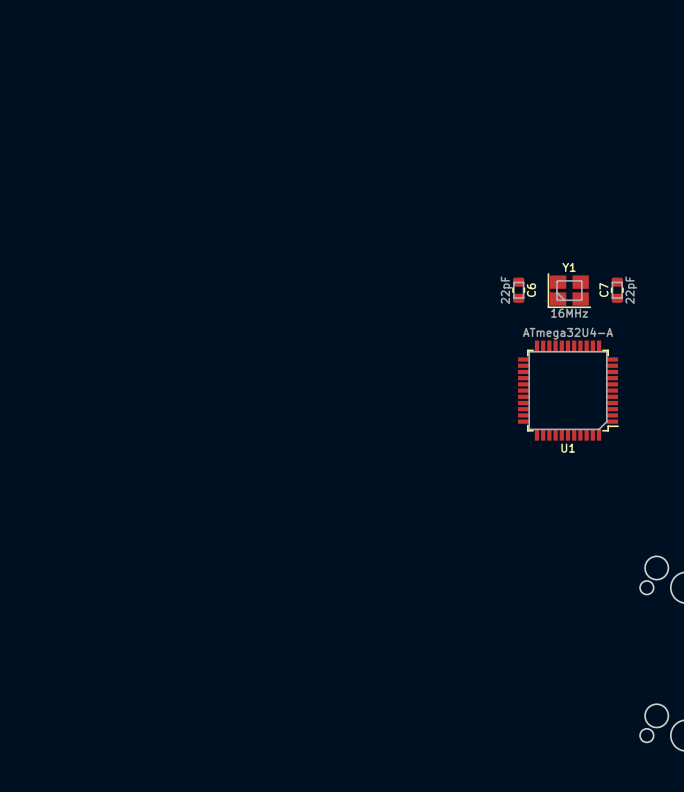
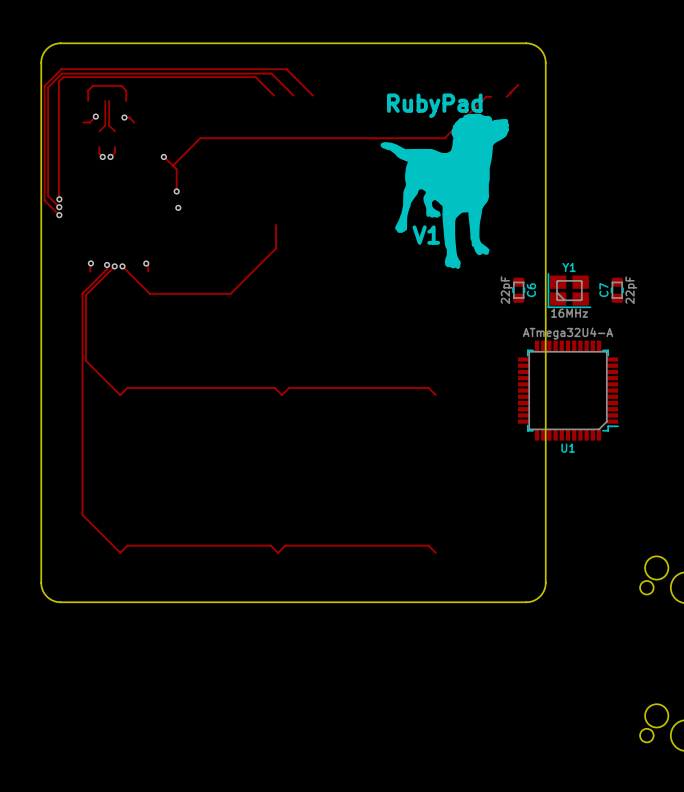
board edge: none -> (60, 43) (526, 43) (534, 45) (541, 50) (545, 62) (545, 582) (543, 591) (538, 598) (526, 602) (60, 602) (52, 600) (45, 594) (41, 582) (41, 62) (46, 49) (60, 43)
track: none -> (518, 84) (506, 96)
track: none -> (274, 95) (255, 77) (63, 77) (58, 81) (59, 199)
track: none -> (293, 95) (271, 73) (61, 73) (48, 87) (48, 195) (59, 207)
track: none -> (312, 95) (286, 69) (61, 69) (44, 86) (44, 200) (59, 215)
track: none -> (491, 96) (486, 96) (444, 138) (200, 138) (173, 166)
track: none -> (88, 100) (88, 90) (93, 85) (121, 85) (126, 90) (126, 100)
track: none -> (105, 100) (105, 125) (99, 131)
track: none -> (109, 100) (109, 125) (115, 131)
drawing: none -> [380, 113, 510, 270]
track: none -> (95, 116) (89, 122) (83, 122)
via: none -> (95, 116)
track: none -> (124, 117) (129, 117) (134, 122)
via: none -> (124, 117)
track: none -> (99, 147) (99, 153) (102, 156)
track: none -> (115, 147) (115, 152) (110, 156)
via: none -> (102, 156)
via: none -> (110, 156)
track: none -> (163, 156) (176, 169) (176, 191)
via: none -> (163, 156)
via: none -> (176, 191)
via: none -> (59, 199)
via: none -> (59, 207)
via: none -> (178, 207)
via: none -> (59, 215)
track: none -> (276, 224) (276, 248) (230, 293) (149, 293) (122, 266)
track: none -> (90, 263) (90, 271)
via: none -> (90, 263)
track: none -> (146, 263) (148, 271)
via: none -> (146, 263)
track: none -> (107, 264) (107, 269) (82, 293) (82, 515) (120, 552) (127, 545) (270, 545) (278, 552) (285, 545) (428, 545) (435, 552)
via: none -> (107, 264)
track: none -> (114, 266) (85, 295) (85, 360) (120, 395) (127, 387) (274, 387) (282, 395) (289, 387) (428, 387) (435, 395)
via: none -> (114, 266)
via: none -> (122, 266)

